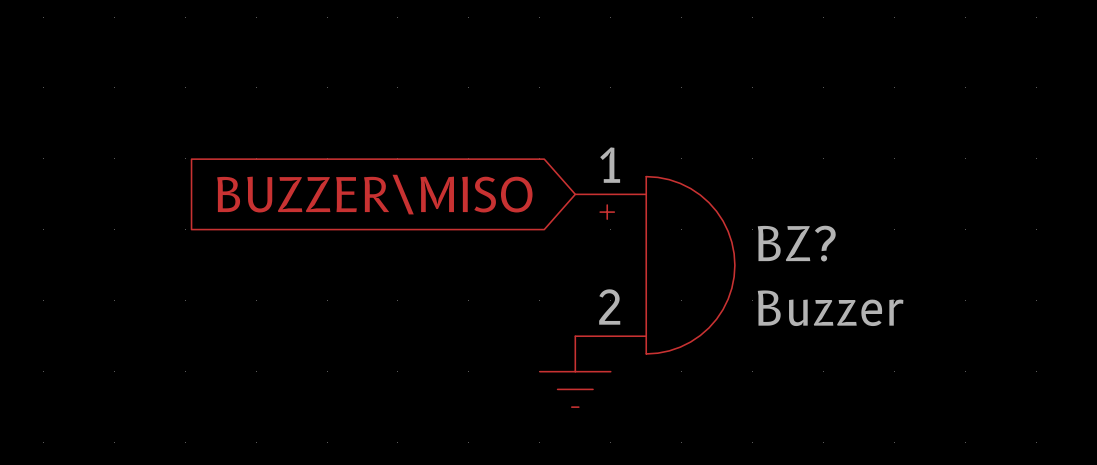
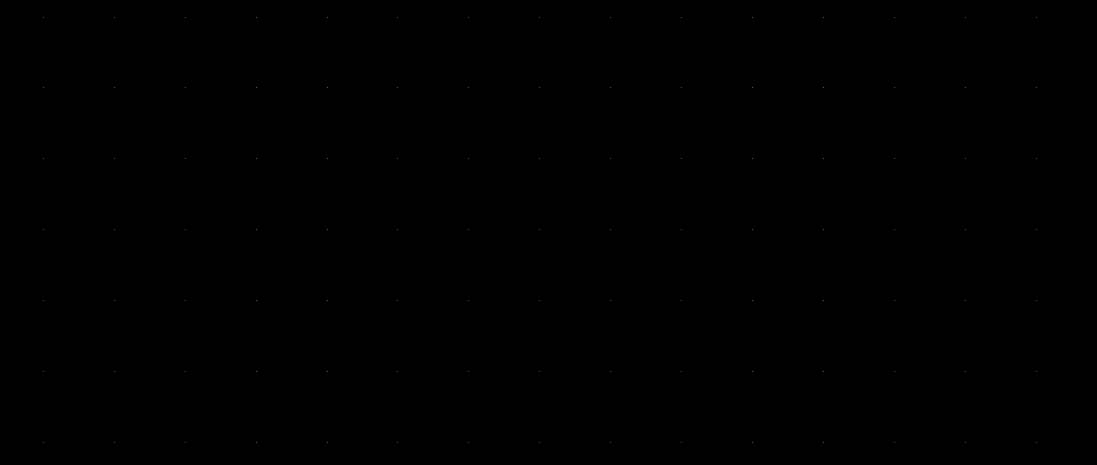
global label: BUZZER\MISO (374, 194) -> none
BZ?: Buzzer (655, 265) -> none
power symbol: (575, 371) -> none

